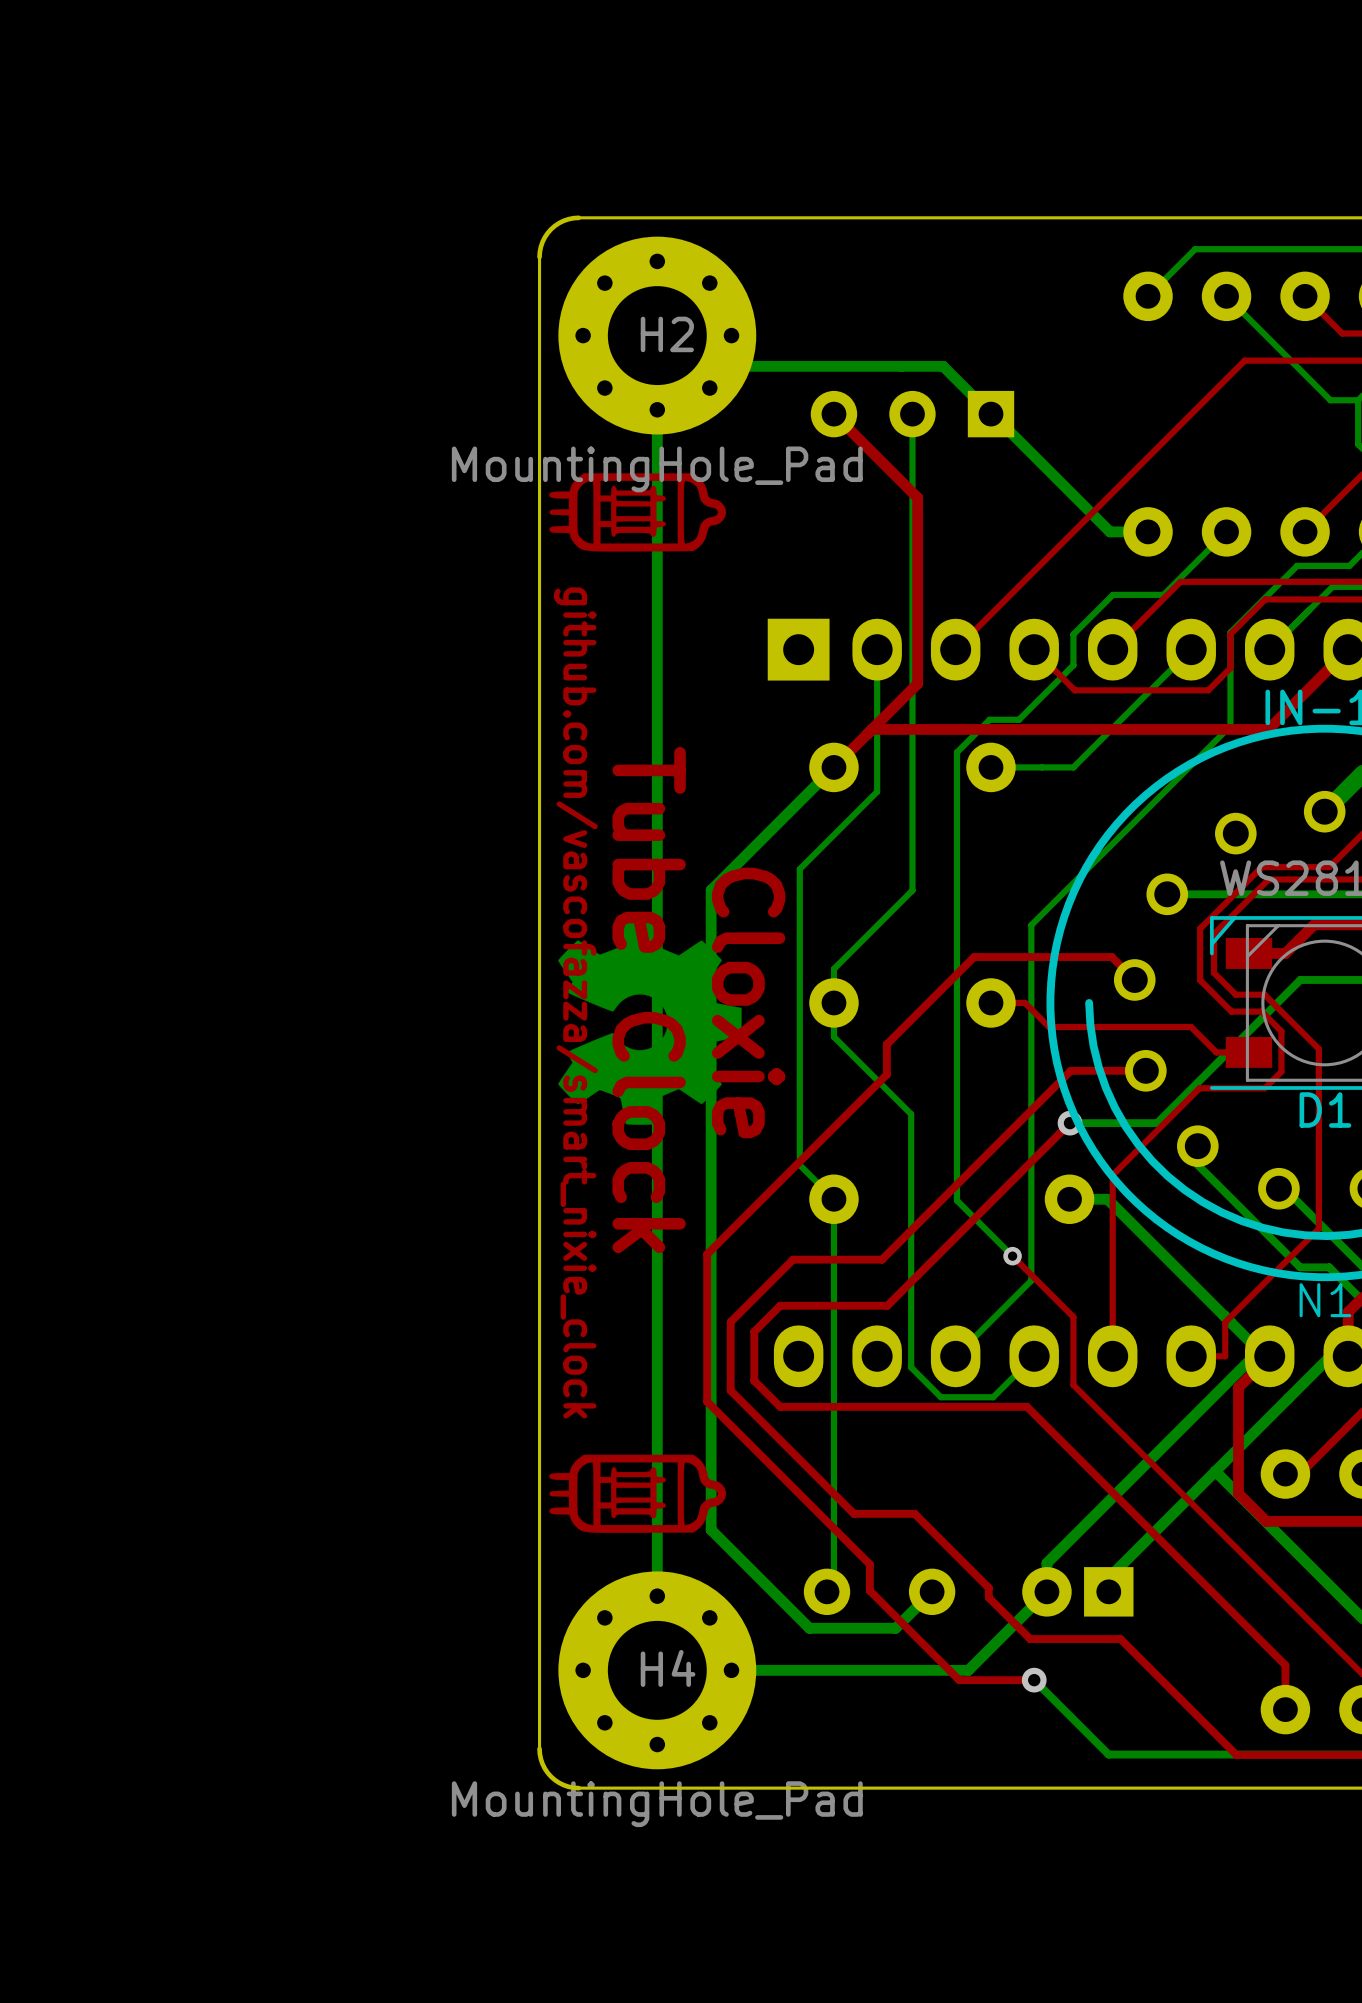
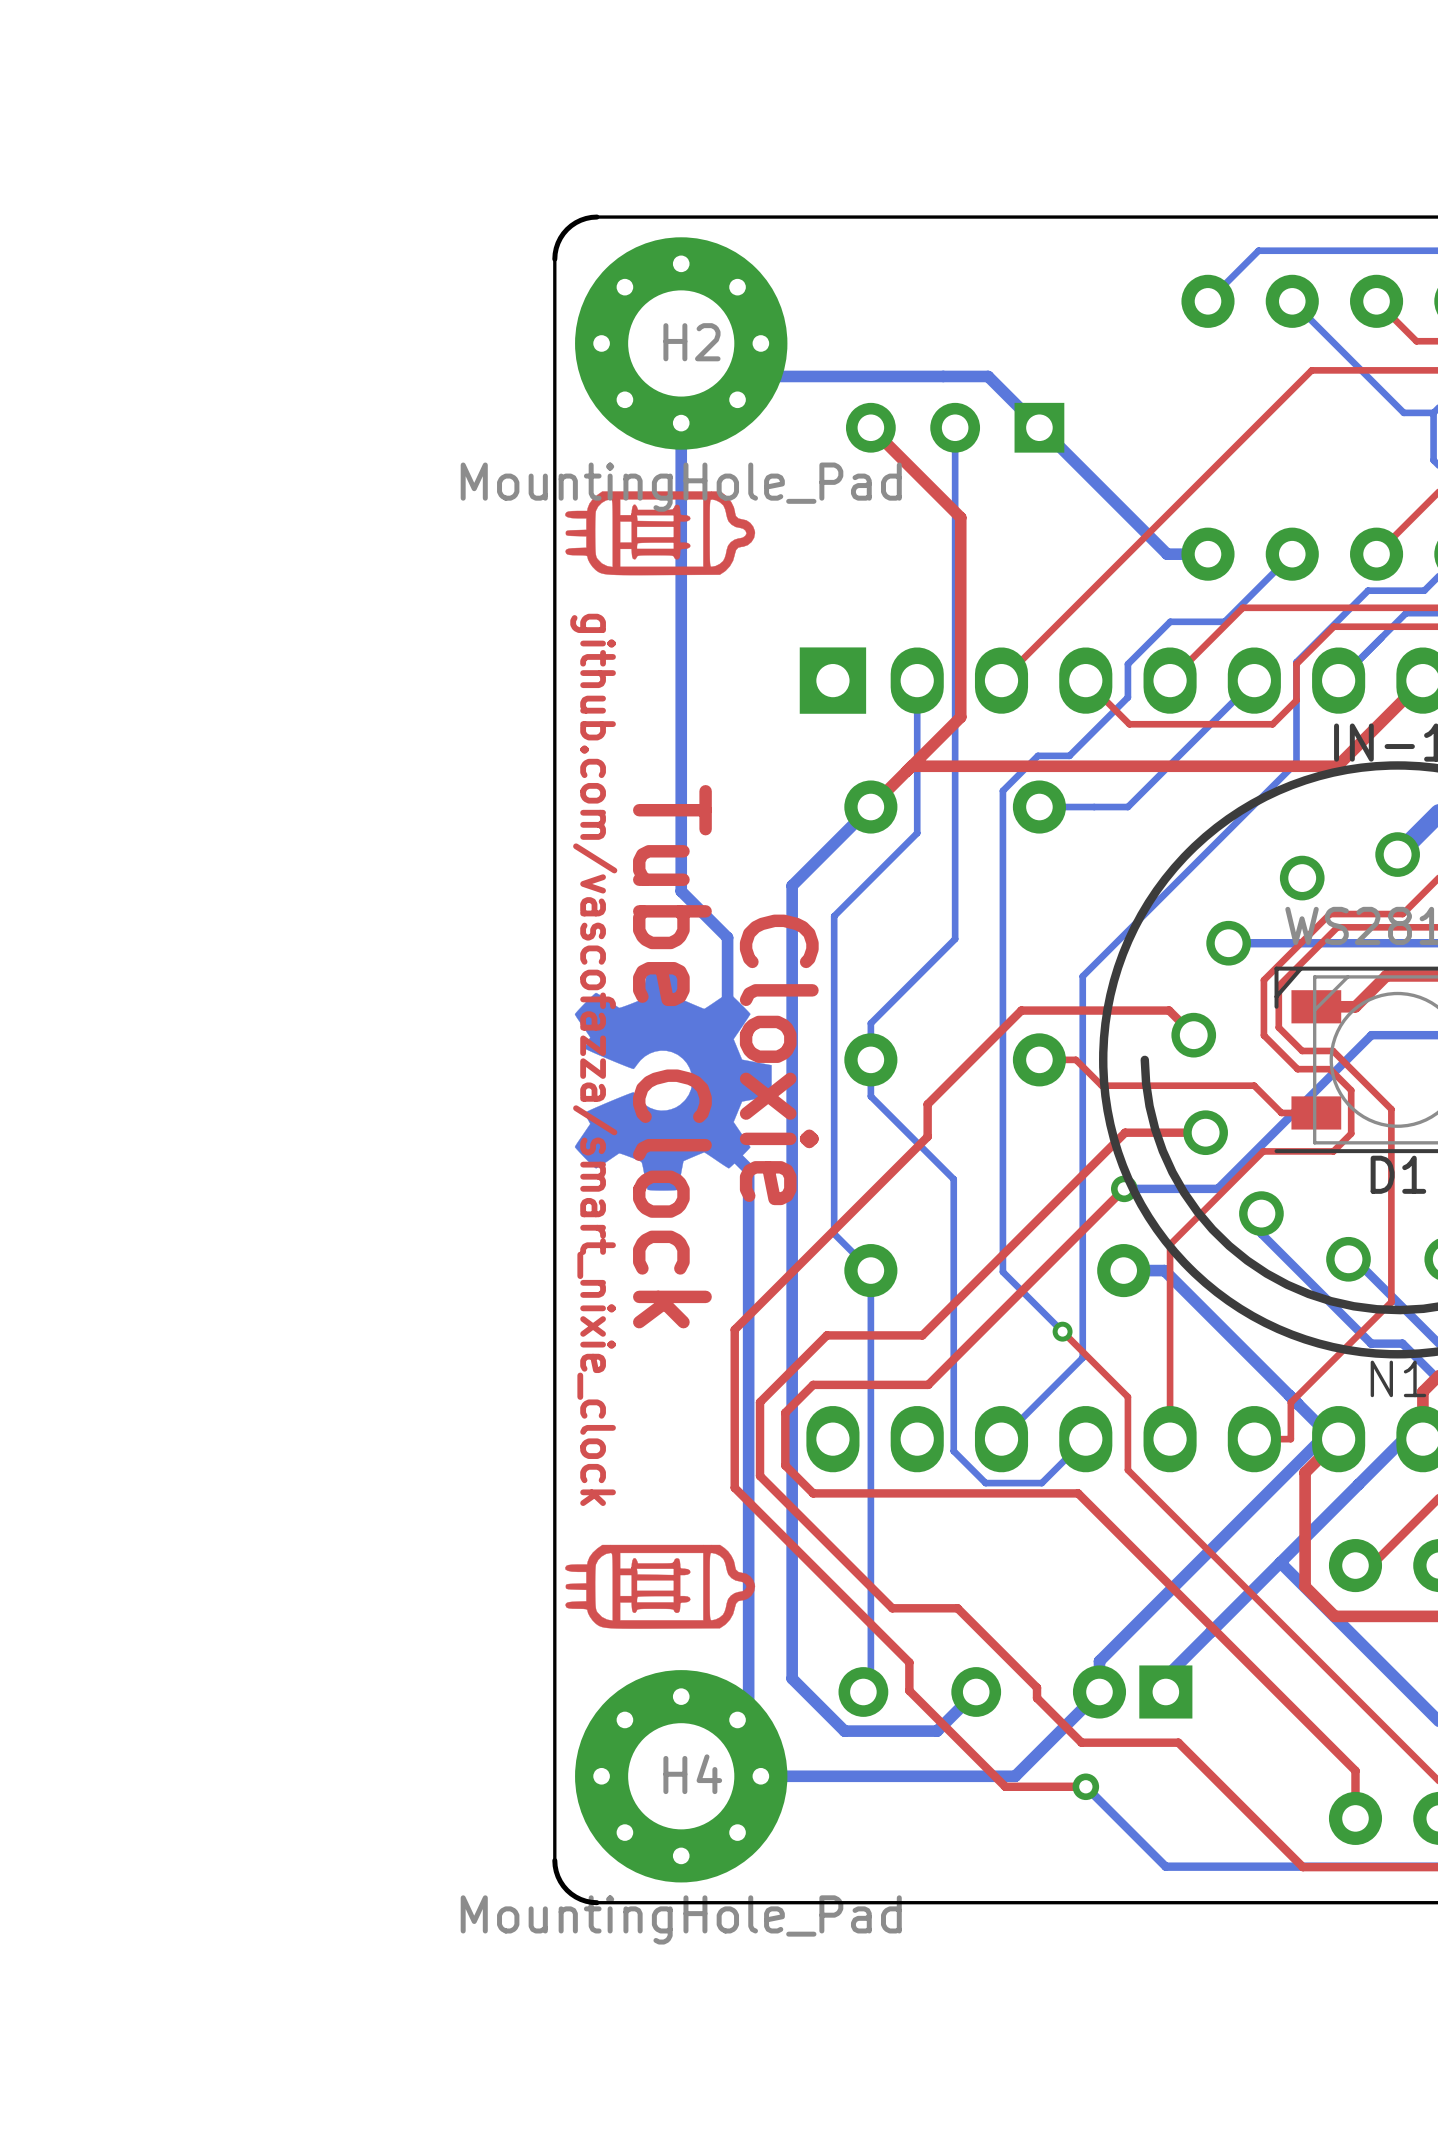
bottom track: (760, 840) (711, 890) (711, 1529) (760, 1579) -> (792, 885) (792, 1678)
bottom track: (657, 845) (657, 1596) -> (681, 891) (727, 937) (727, 1009) (710, 1026) (710, 1131) (748, 1169) (748, 1708) (681, 1776)

